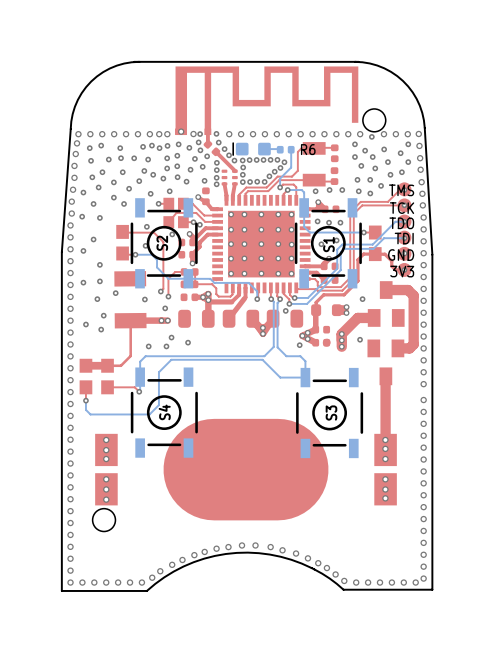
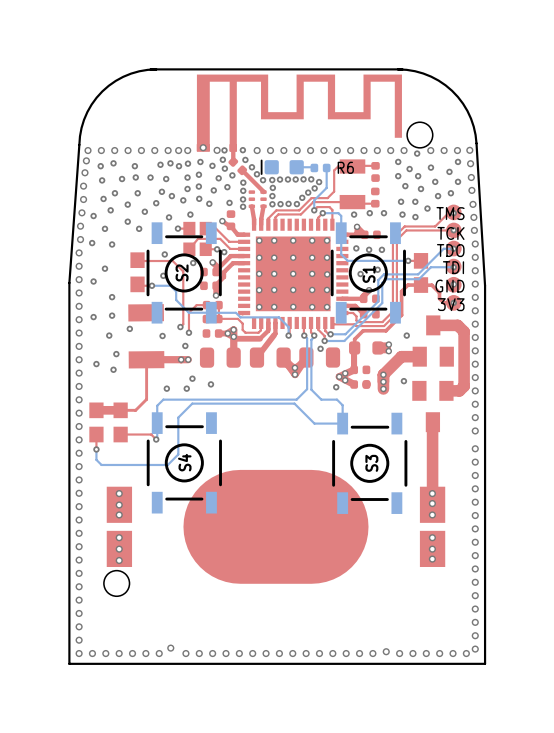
via: (242, 545) -> none
via: (255, 545) -> none
via: (228, 547) -> none
via: (270, 547) -> none
via: (216, 548) -> none
via: (282, 550) -> none
via: (204, 551) -> none
via: (296, 553) -> none
via: (194, 555) -> none
via: (307, 558) -> none
via: (182, 559) -> none
via: (318, 563) -> none
via: (172, 564) -> none
via: (326, 568) -> none
via: (160, 571) -> none
via: (335, 574) -> none
via: none -> (185, 653)
via: none -> (199, 653)
via: none -> (212, 653)
via: none -> (226, 653)
via: none -> (239, 653)
via: none -> (252, 653)
via: none -> (266, 653)
via: none -> (279, 653)
via: none -> (292, 653)
via: none -> (306, 653)
via: none -> (319, 653)
via: none -> (332, 653)
via: none -> (346, 653)
via: none -> (359, 653)
via: none -> (372, 653)
board edge: (432, 589) (343, 589) (322, 573) (301, 563) (280, 556) (247, 552) (214, 555) (193, 562) (173, 571) (146, 590) (61, 590) -> (485, 661) (485, 663) (69, 663)

